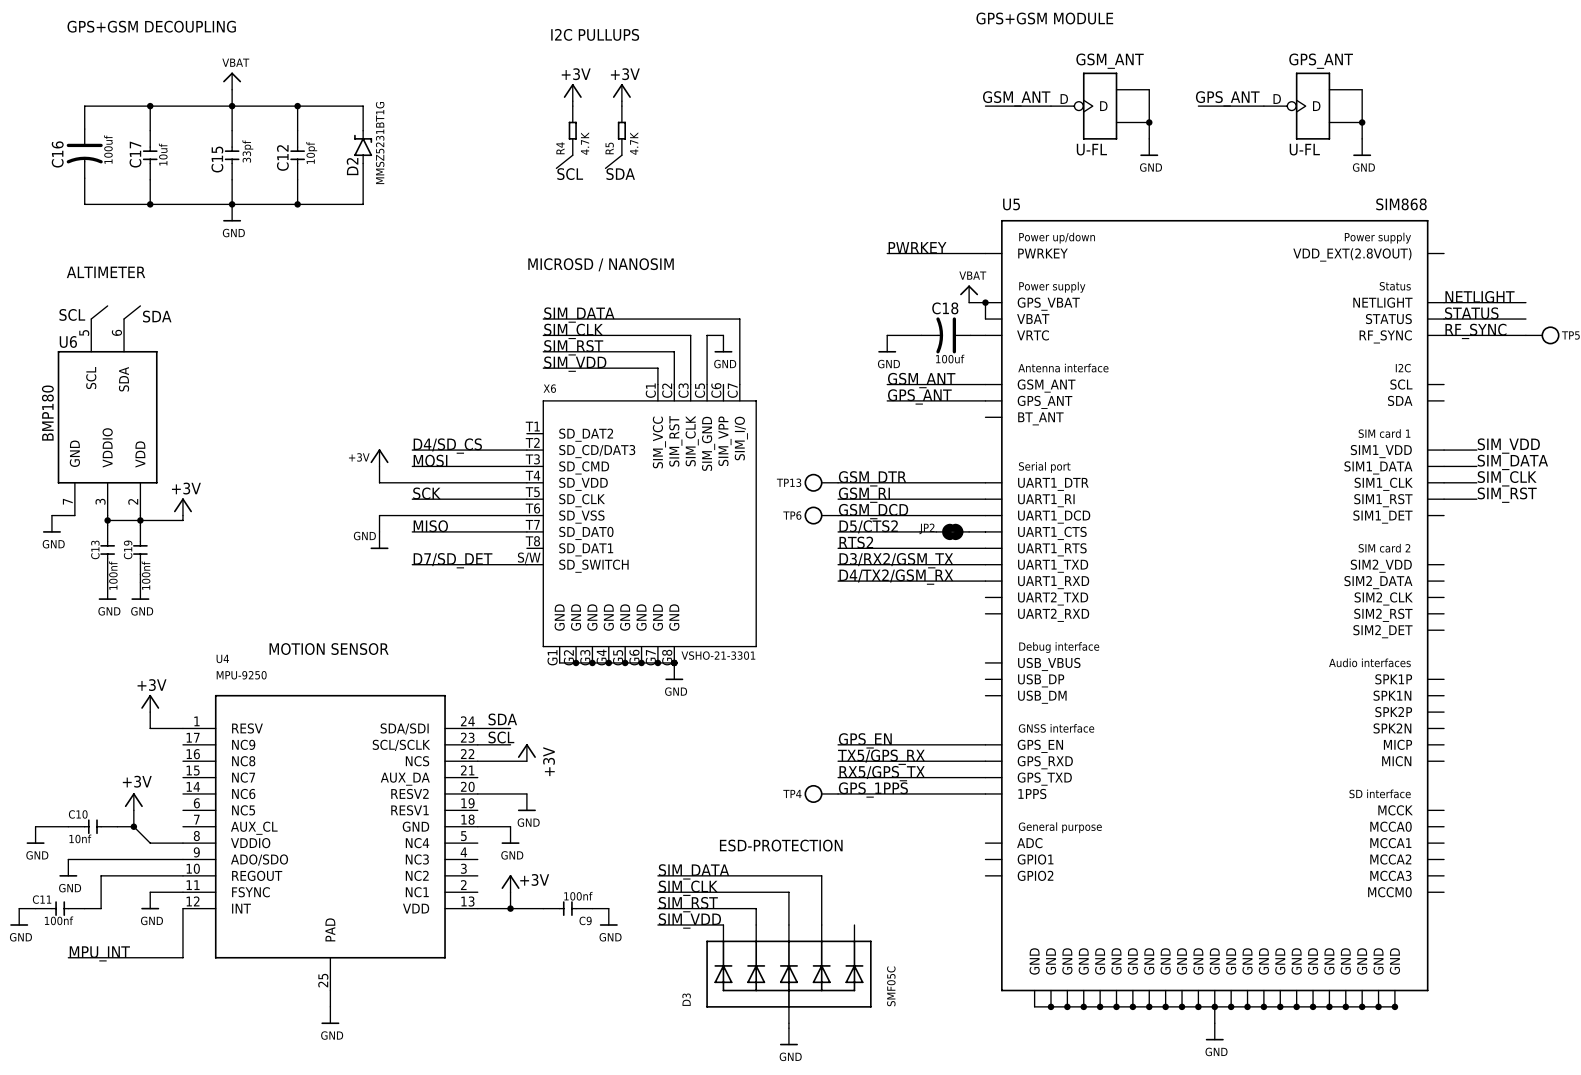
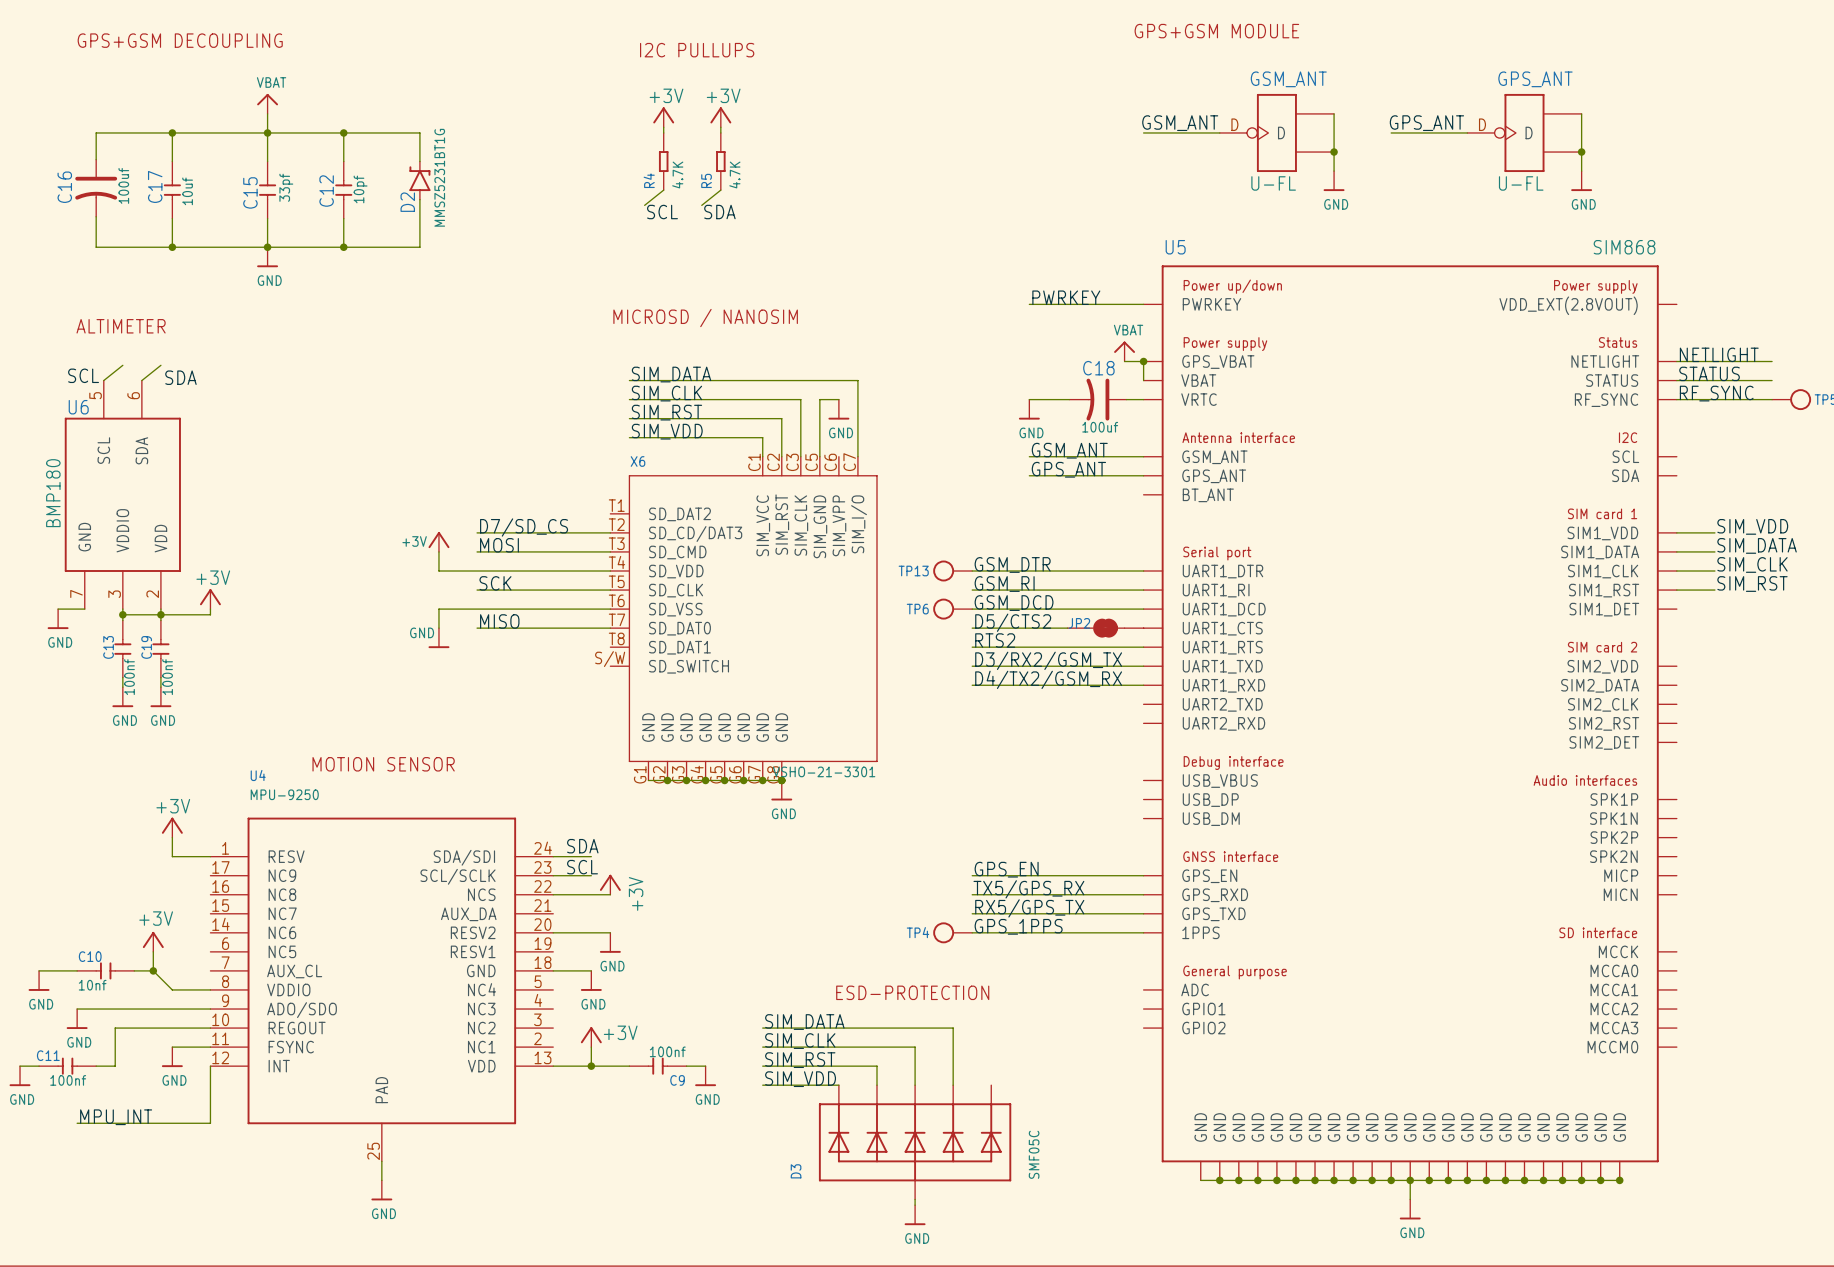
label: D4/SD_CS (447, 446) -> D7/SD_CS (524, 527)
label: D7/SD_DET (453, 560) -> none
wire: (412, 564) (526, 564) -> none

